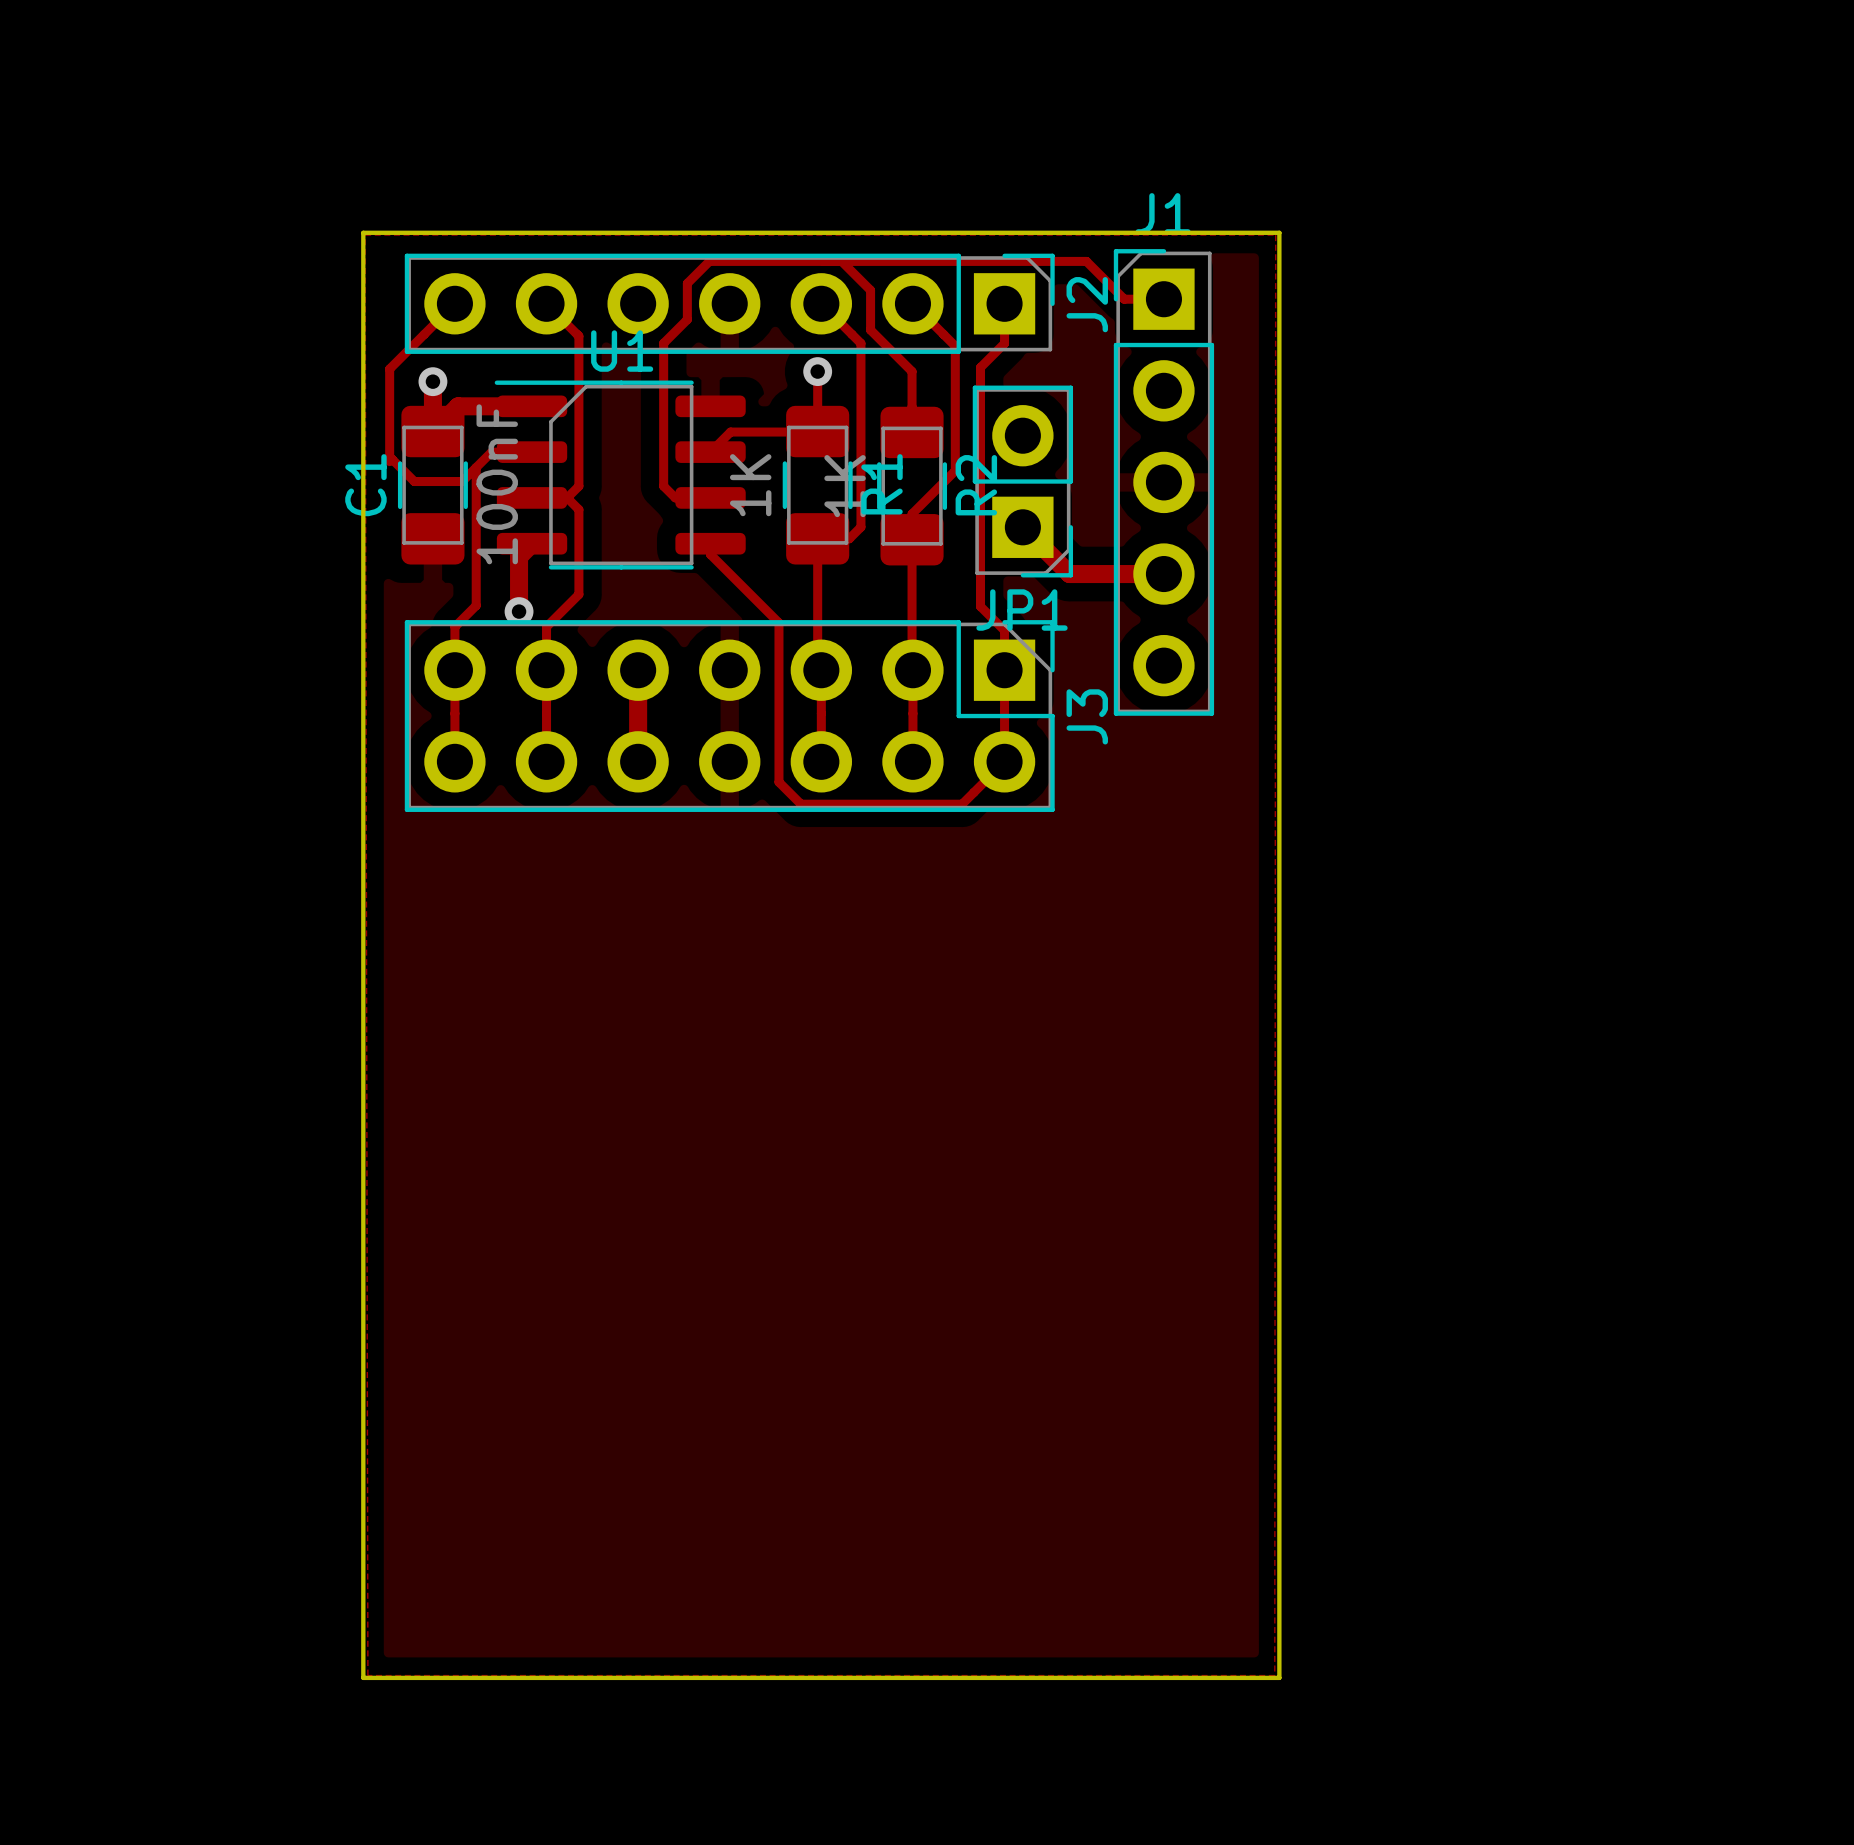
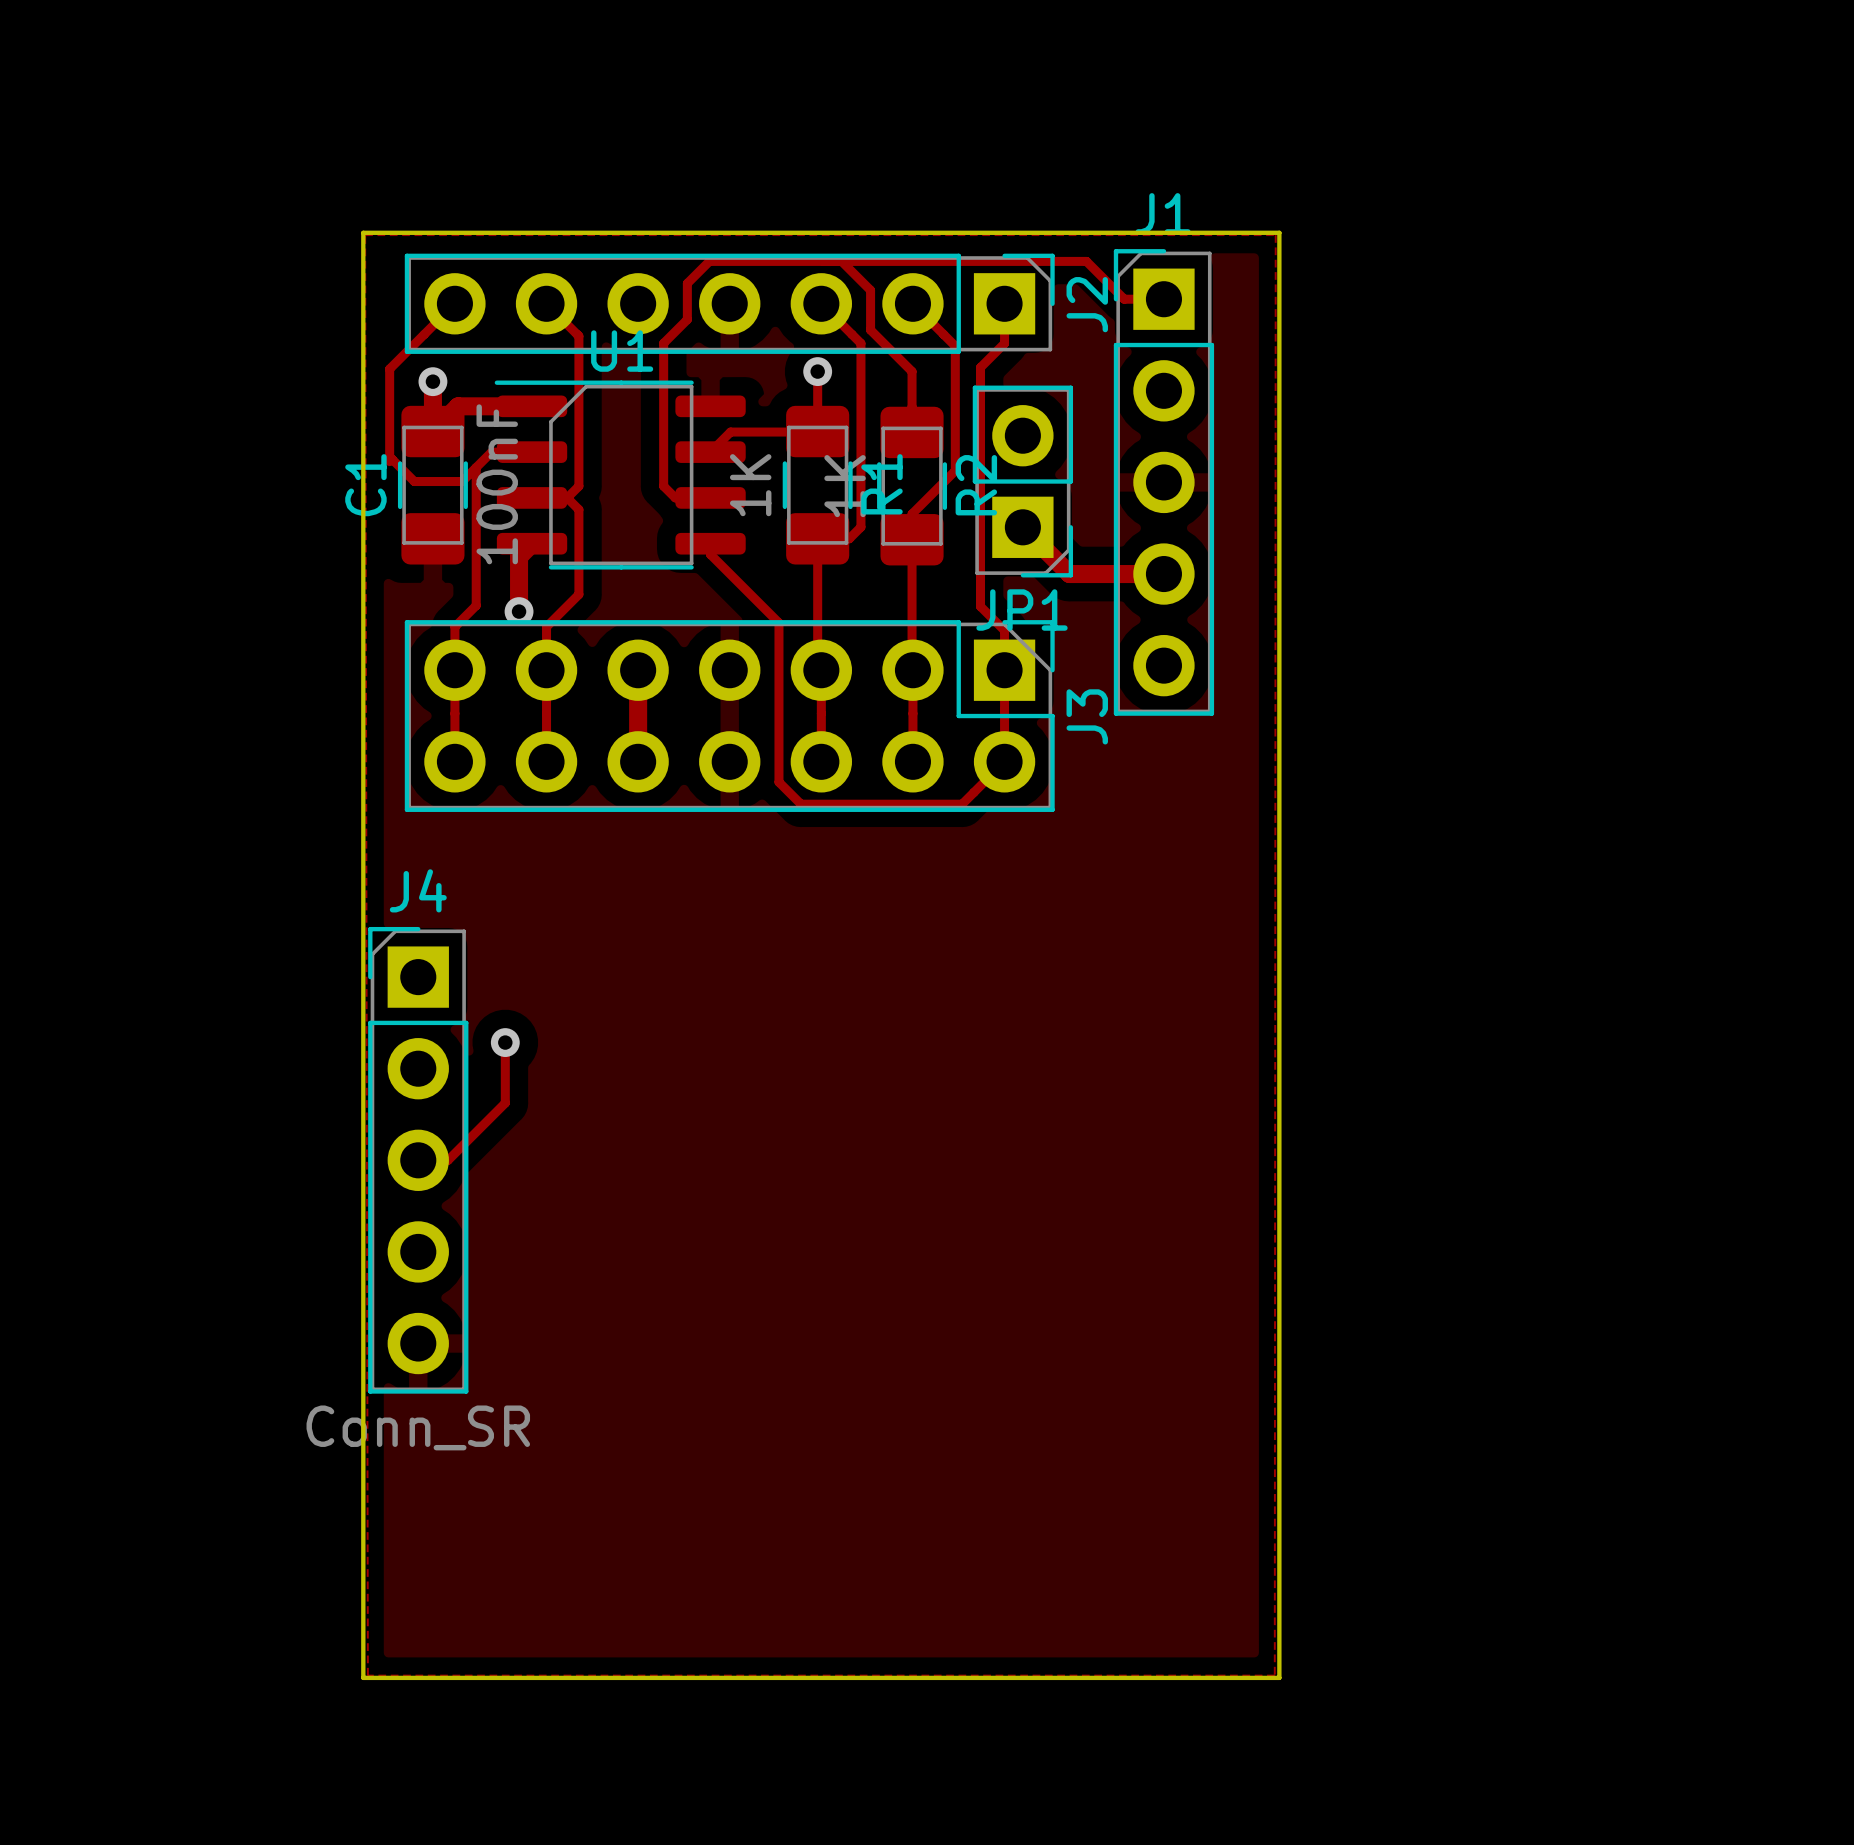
track: none -> (505, 1042) (505, 1103) (448, 1160) (418, 1160)
via: none -> (505, 1042)
J4: none -> Conn_SR (418, 1160)

